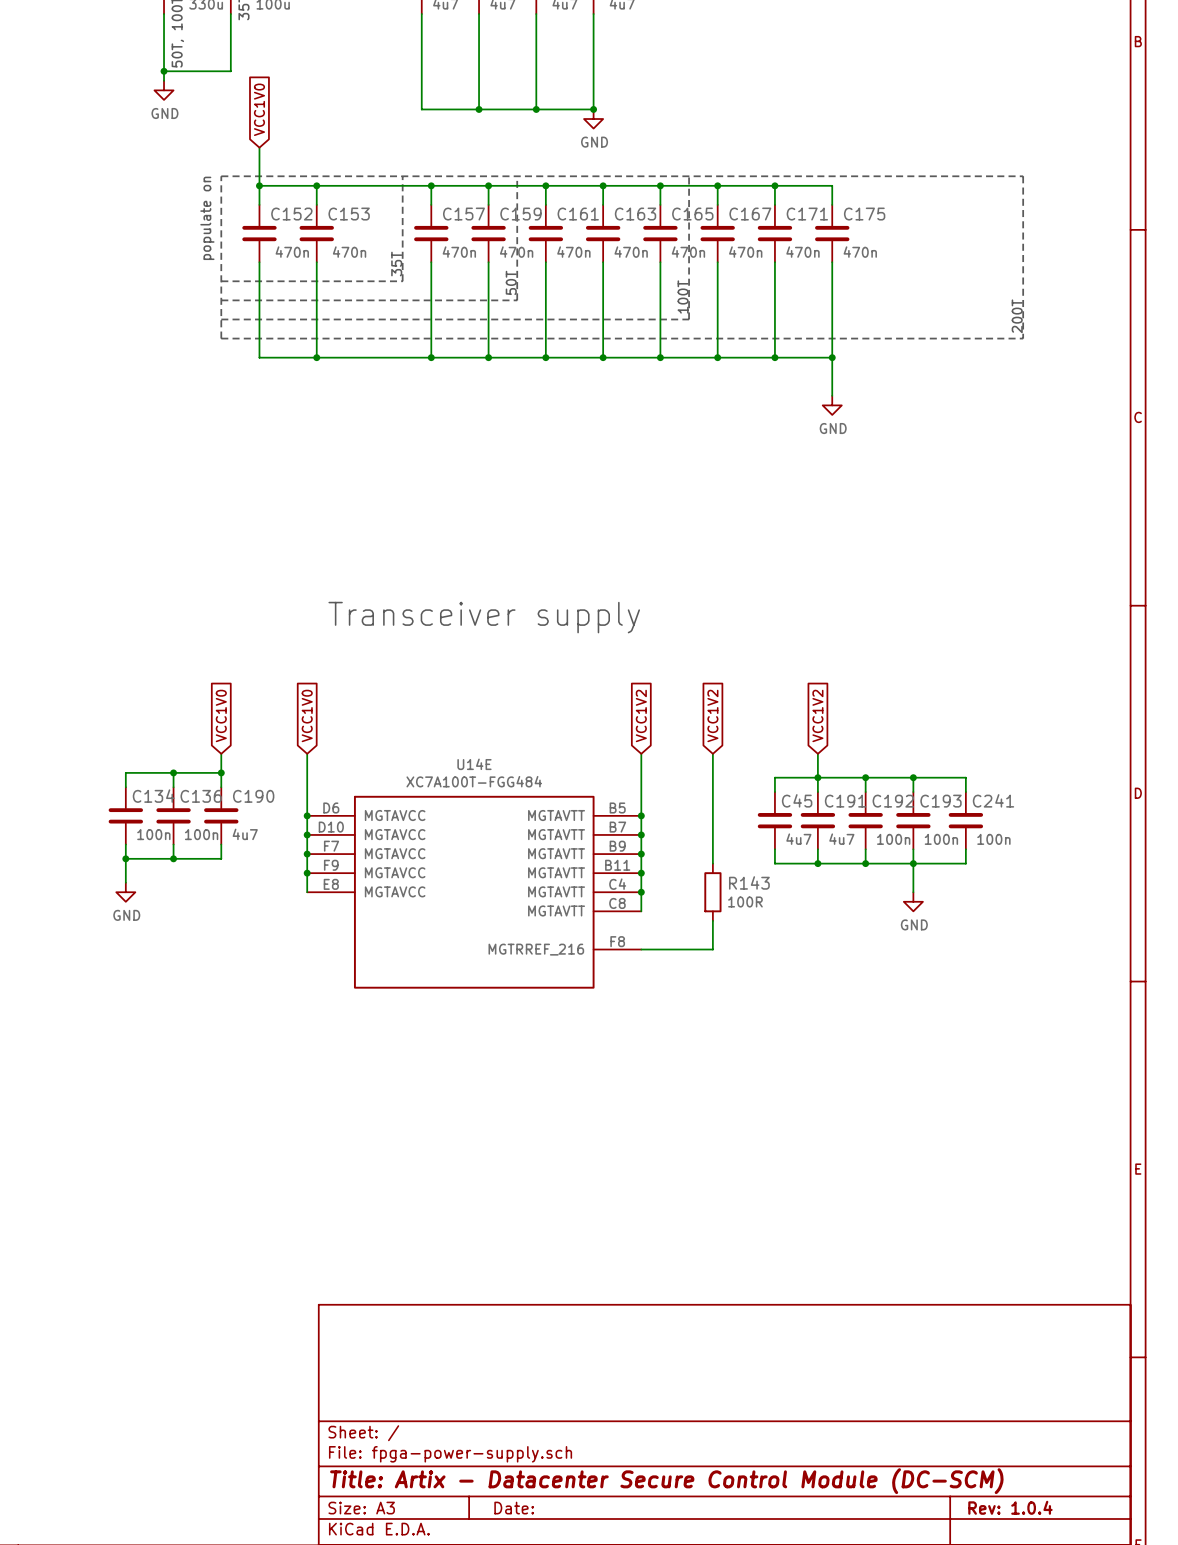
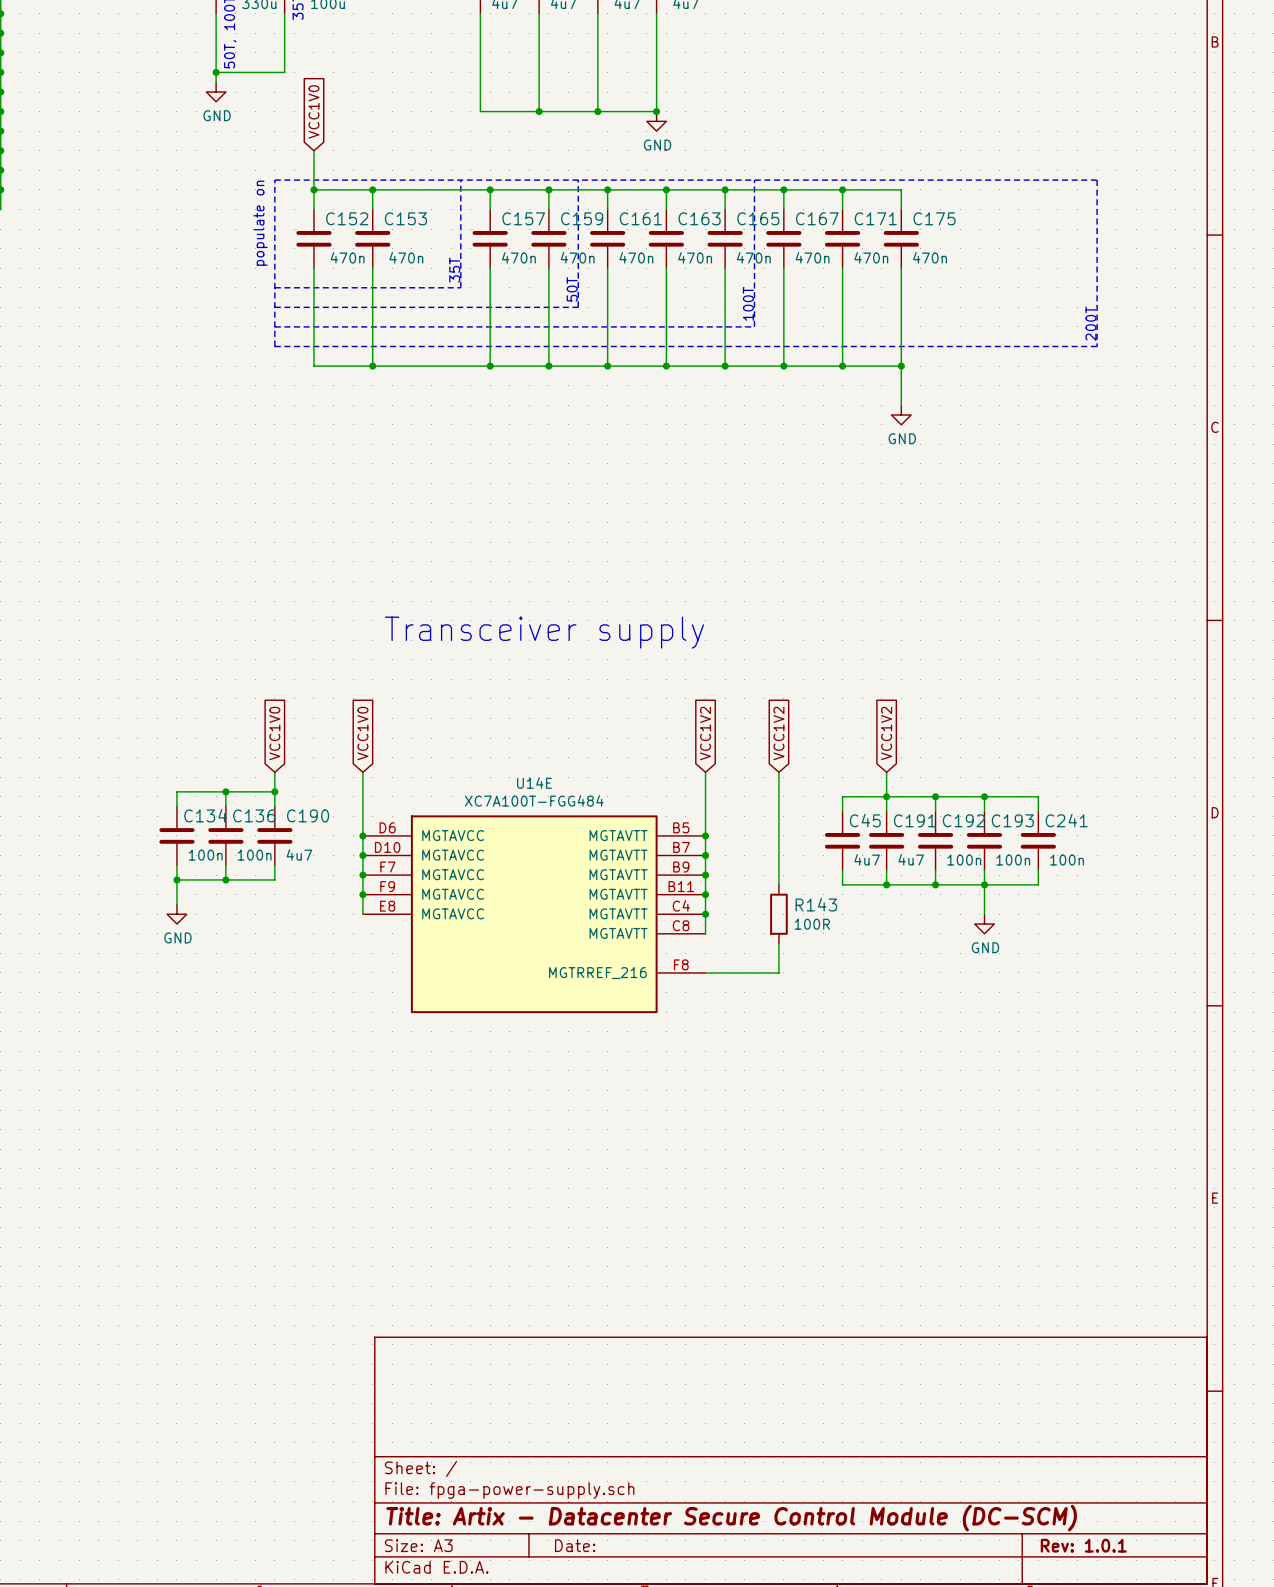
title block: Rev: 1.0.4 (1010, 1507) -> Rev: 1.0.1 (1083, 1545)

